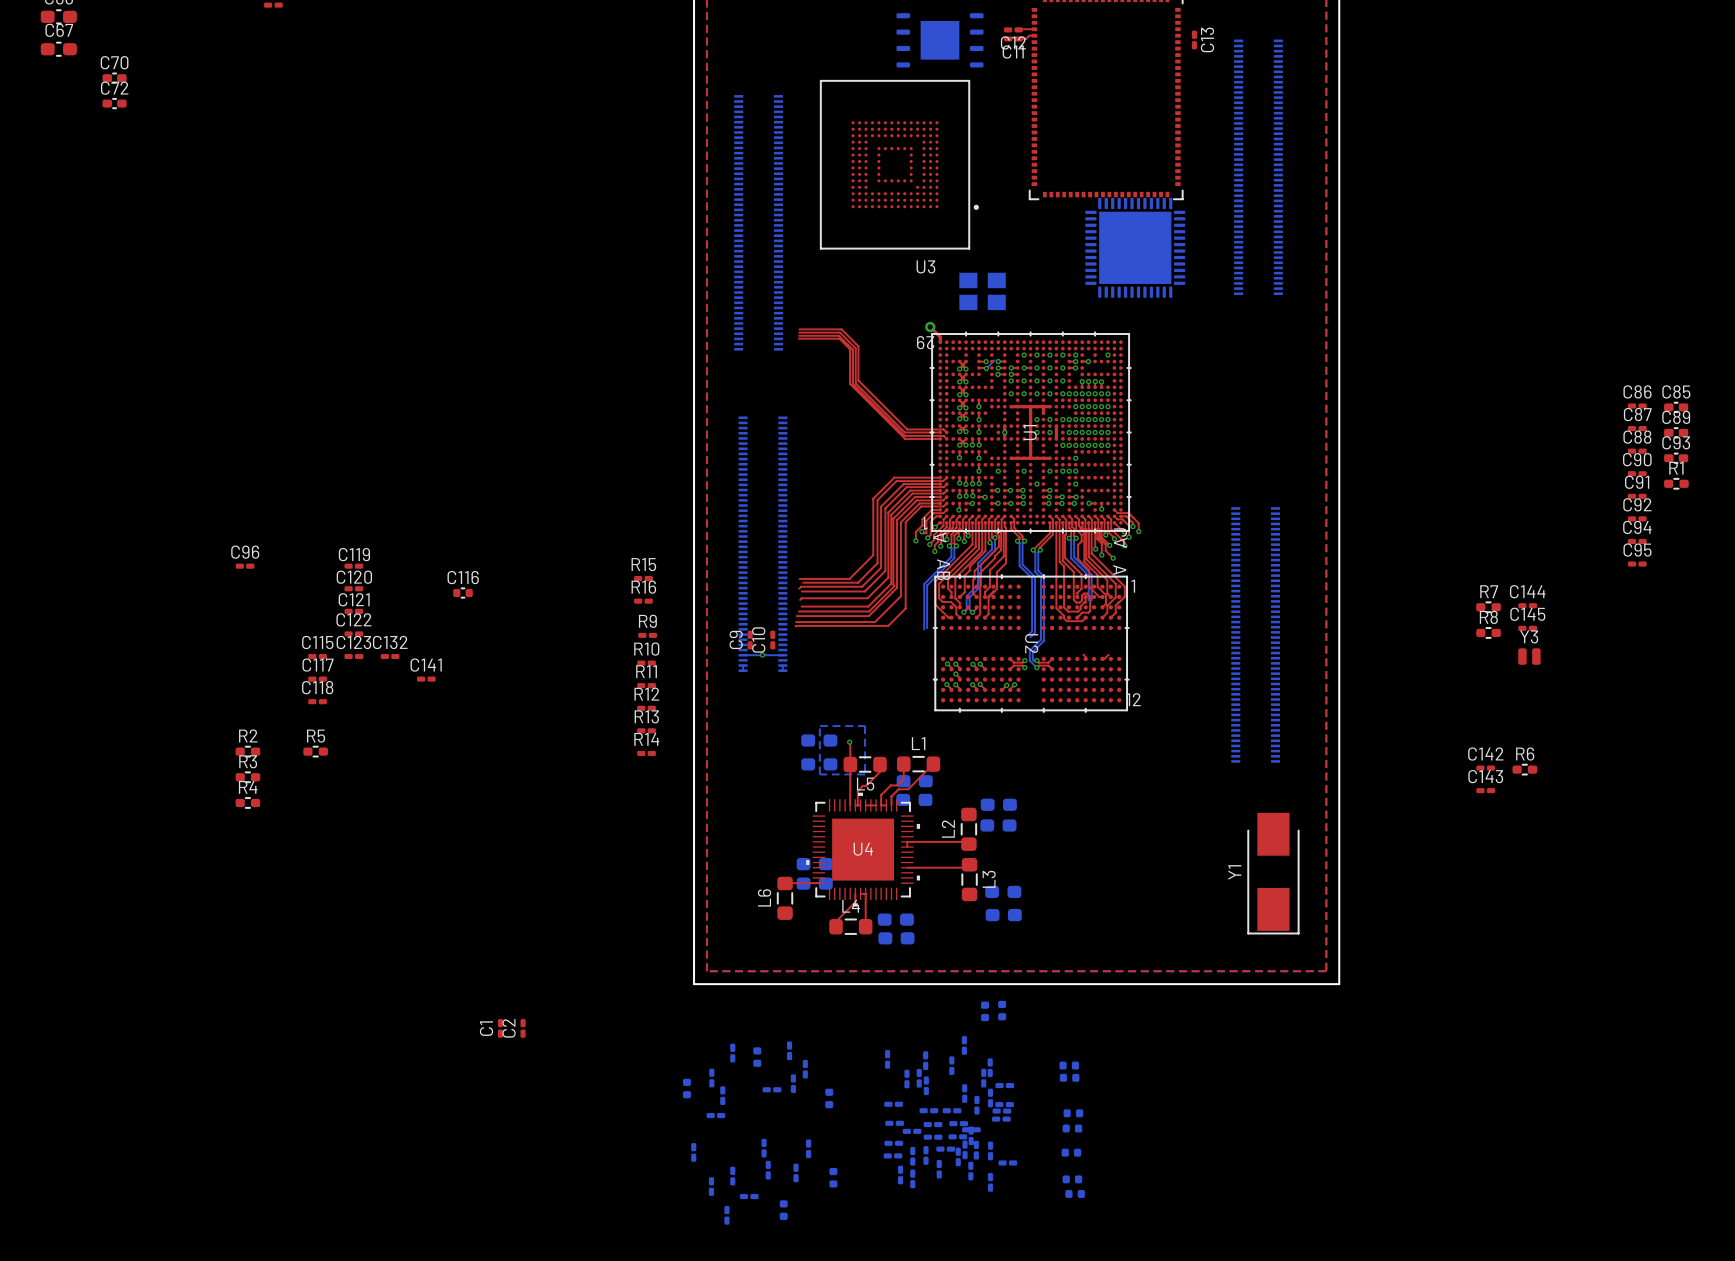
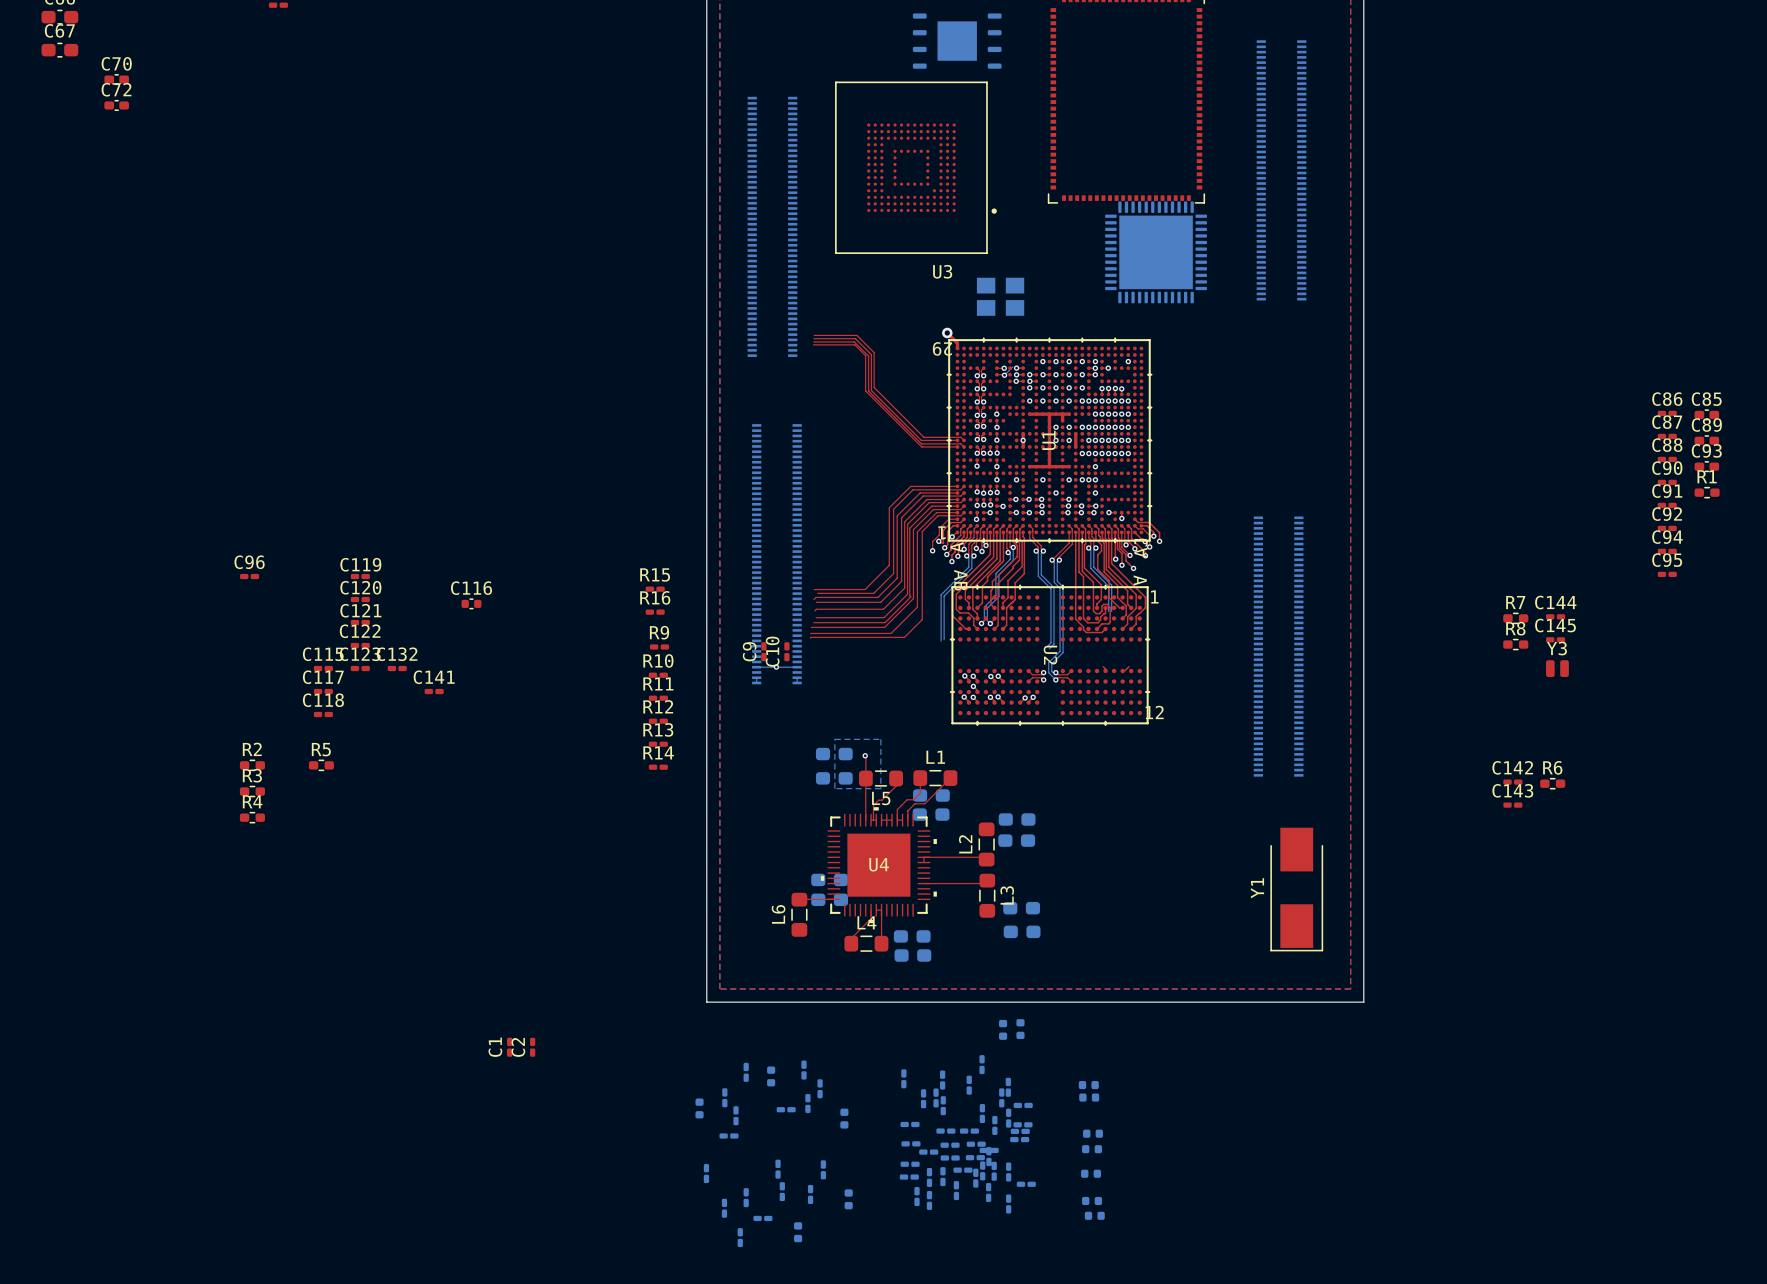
C12: (1013, 29) -> none
top track: (1034, 29) (1018, 29) -> none
top track: (1034, 35) (1018, 38) -> none
C11: (1013, 38) -> none
C13: (1194, 39) -> none

